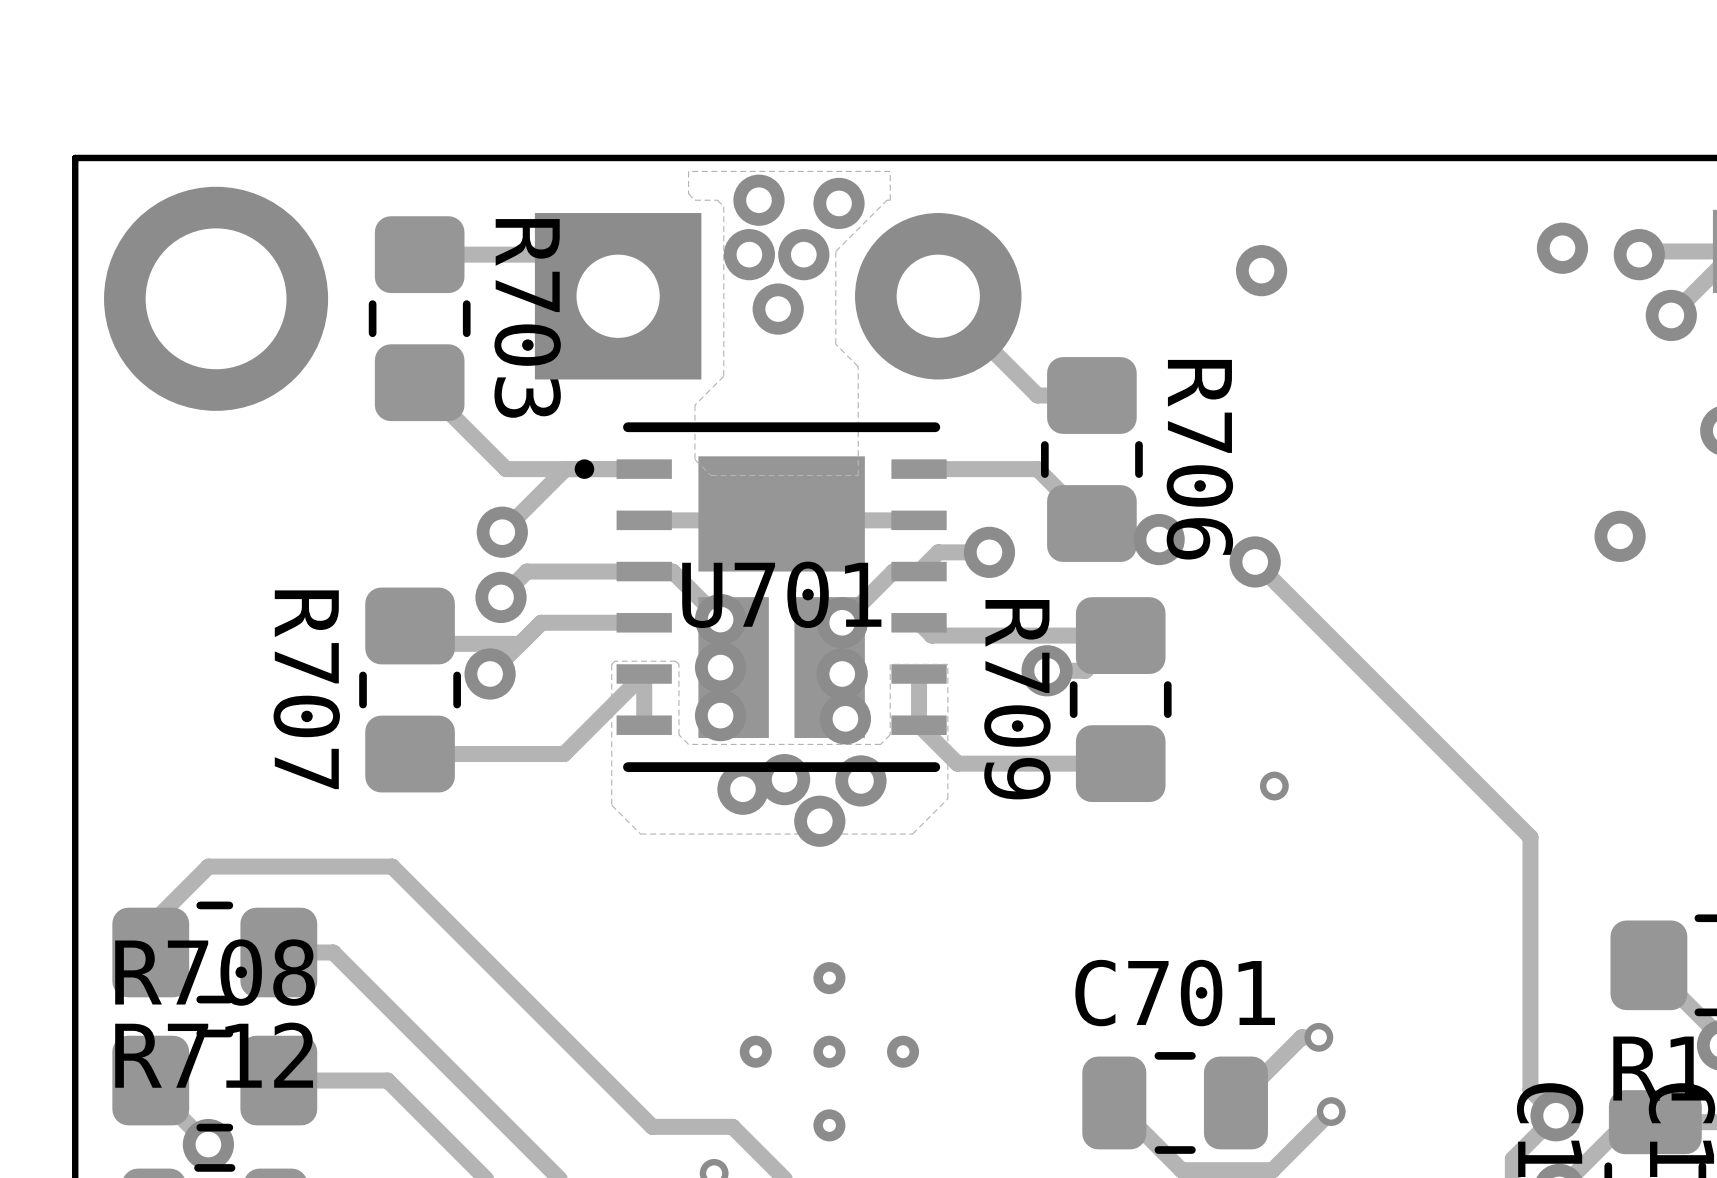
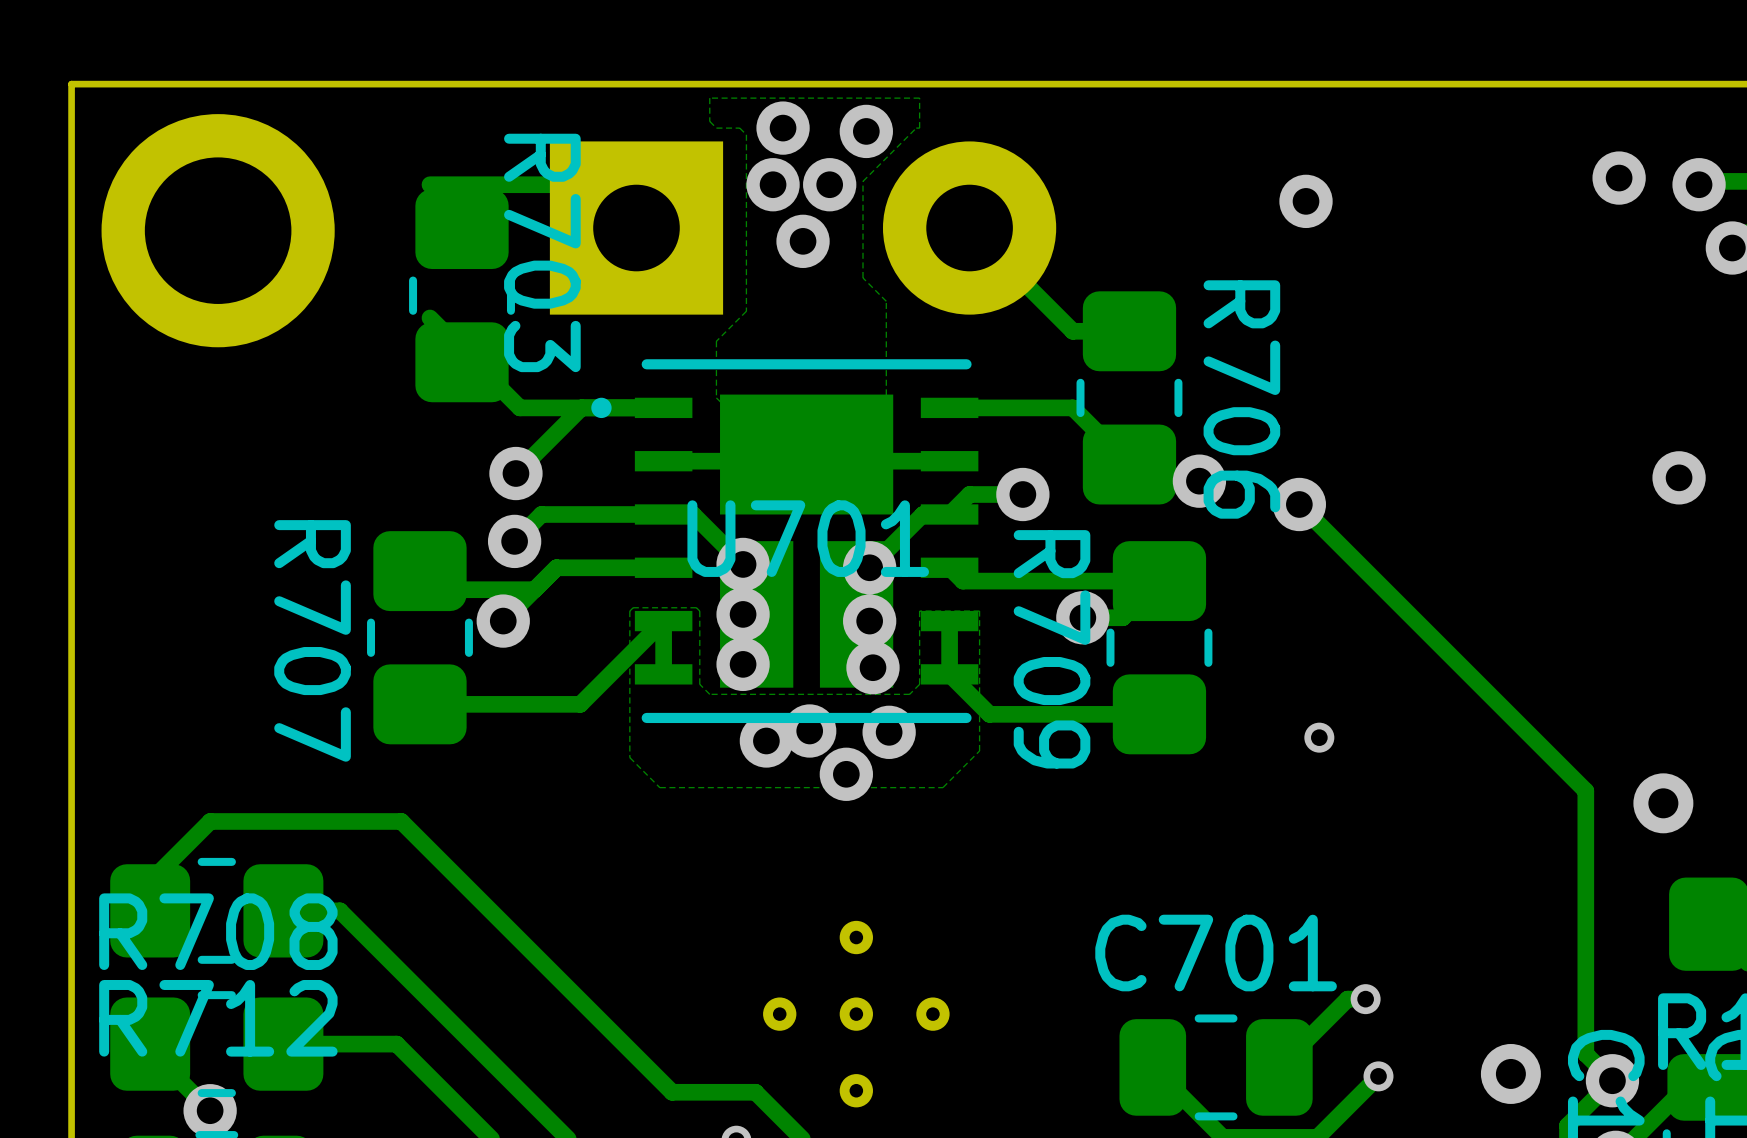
R703 position: (419, 318) -> (462, 295)
via: none -> (1663, 803)
via: none -> (1510, 1073)

